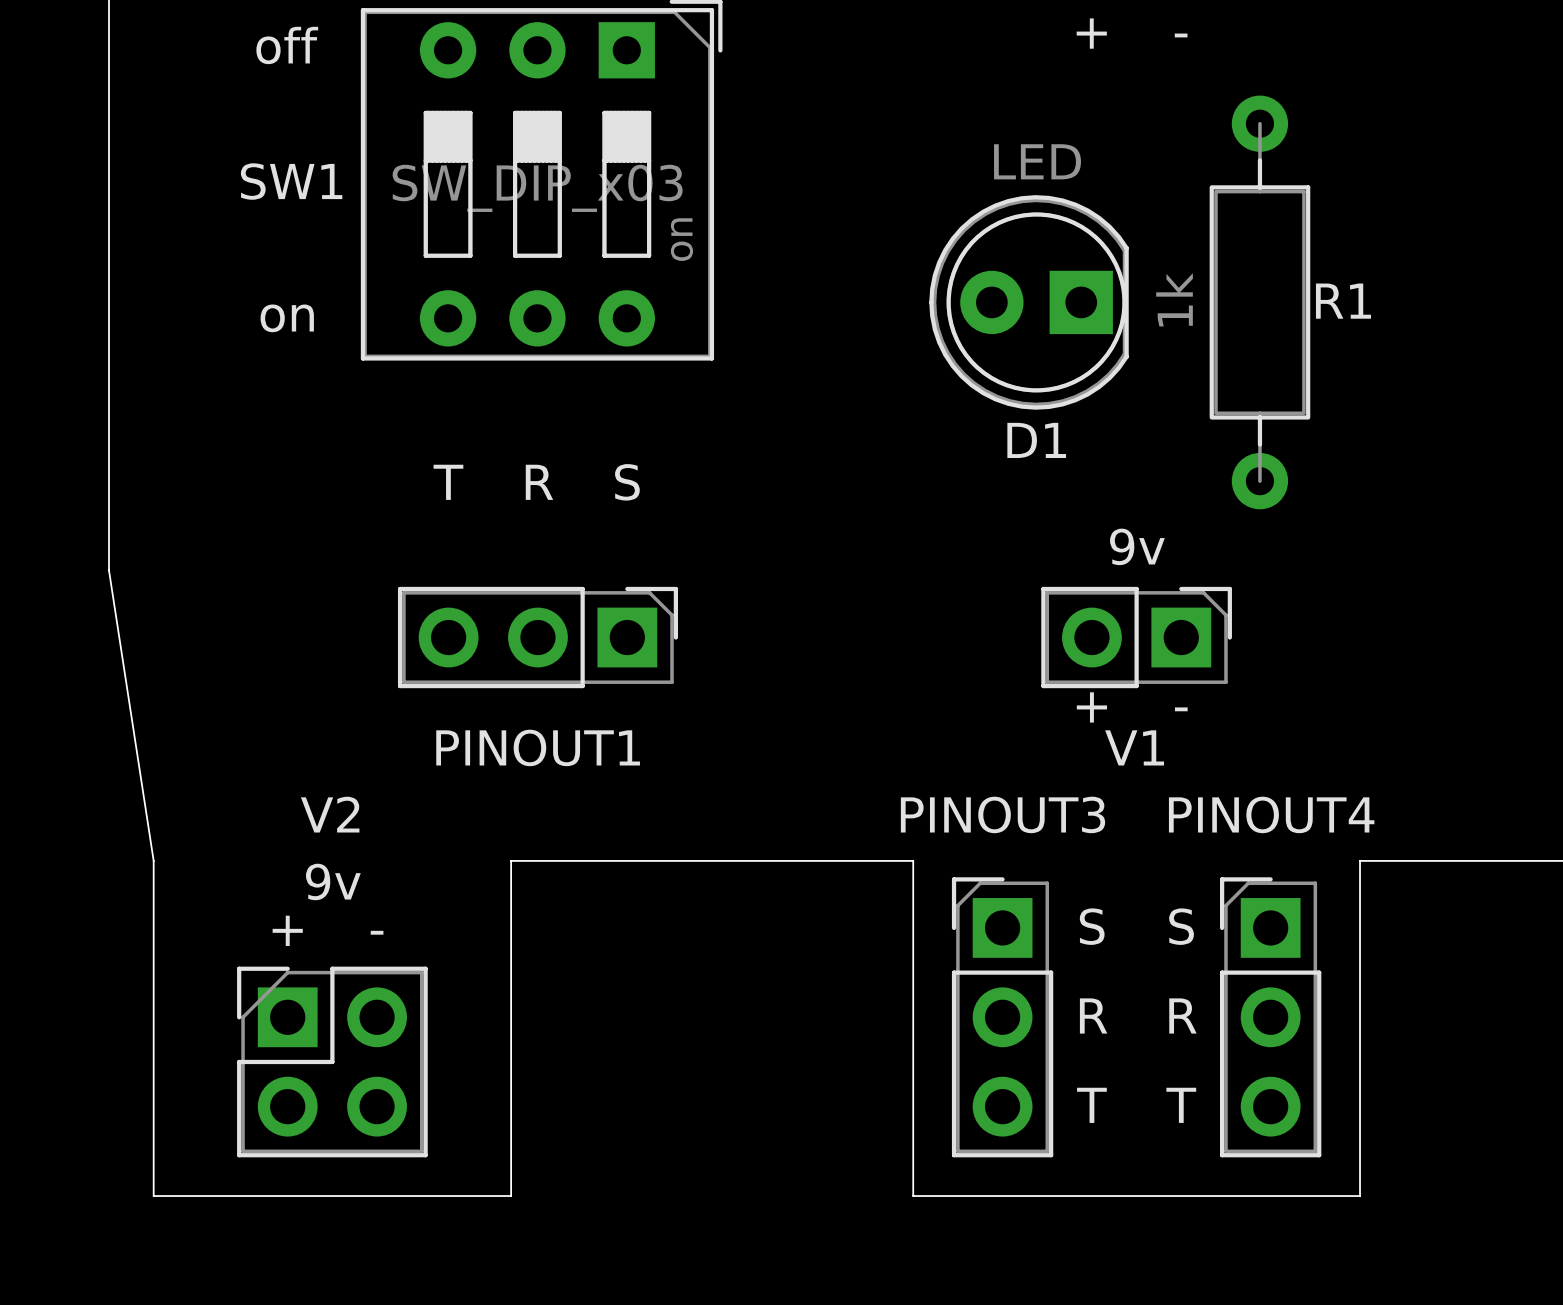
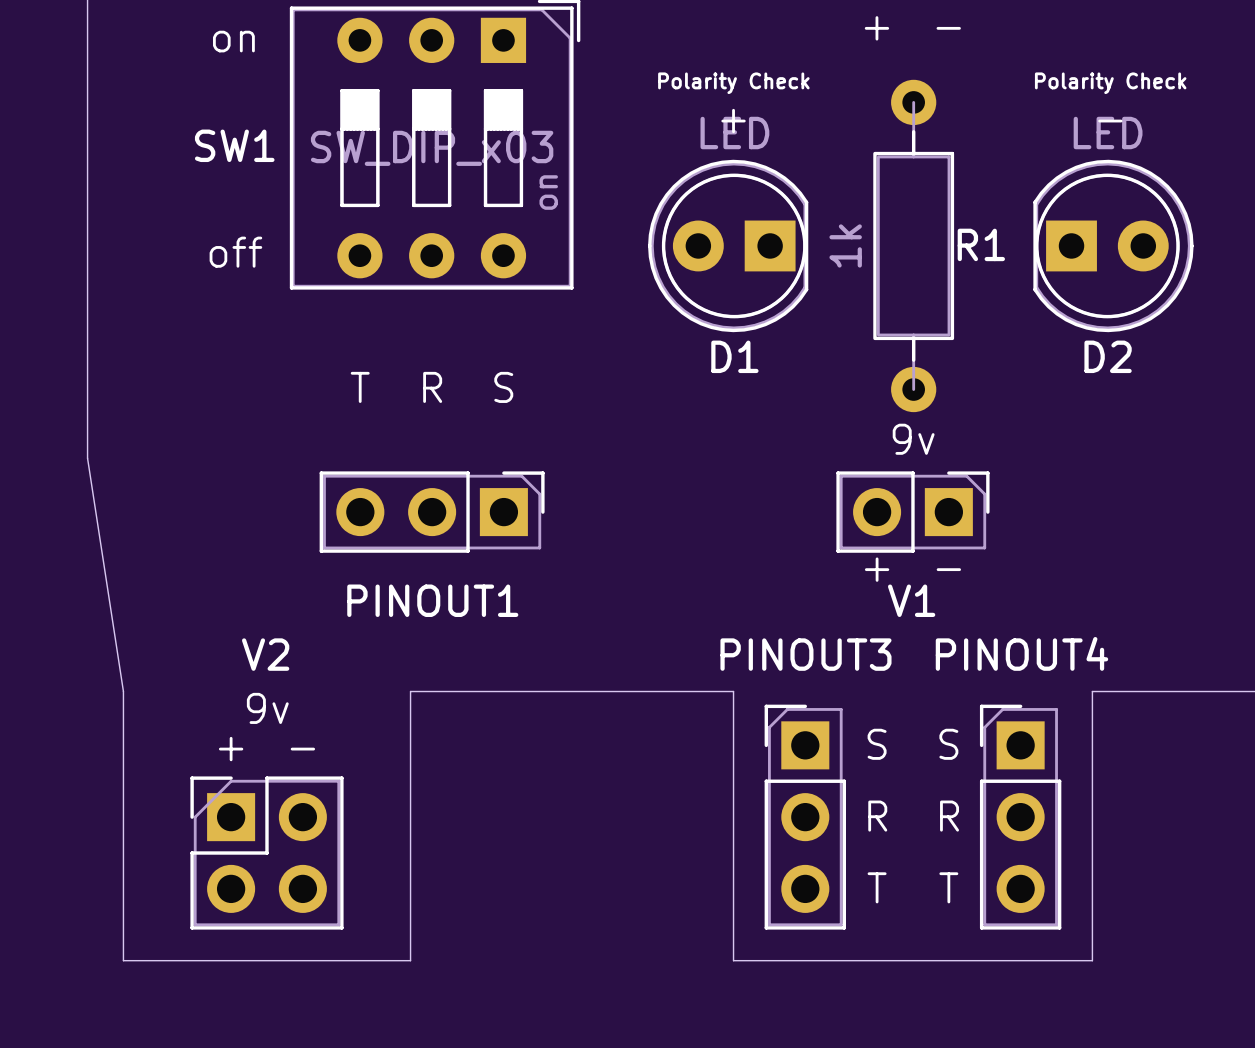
text: off (287, 45) -> on (233, 41)
text: none -> Polarity Check (733, 83)
text: none -> Polarity Check (1110, 83)
text: none -> + (733, 121)
text: none -> - (1110, 121)
D1 position: (1029, 302) -> (728, 245)
R1 position: (1259, 302) -> (913, 245)
D2: none -> LED (1113, 245)
text: on (287, 318) -> off (235, 252)

